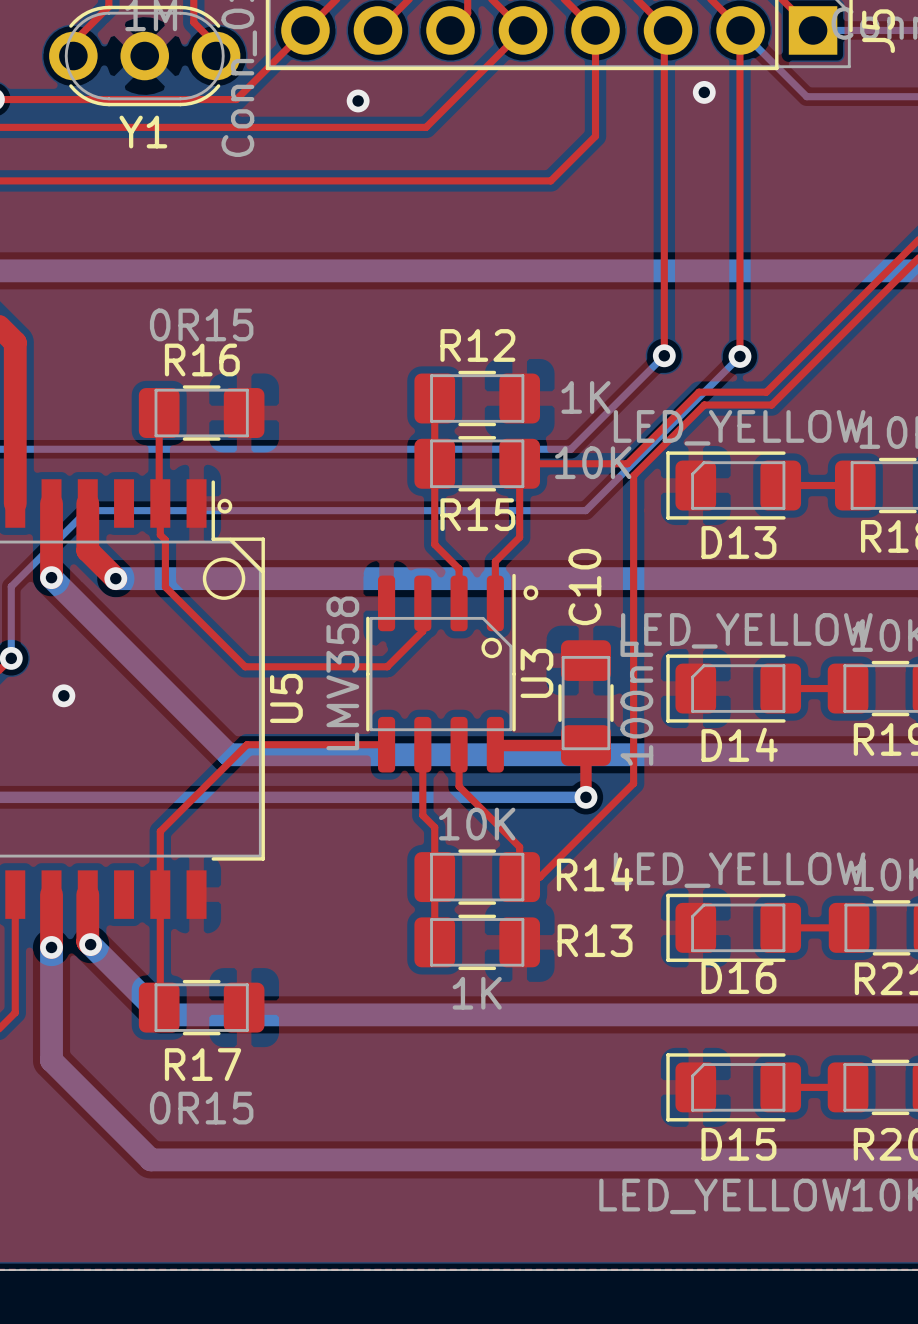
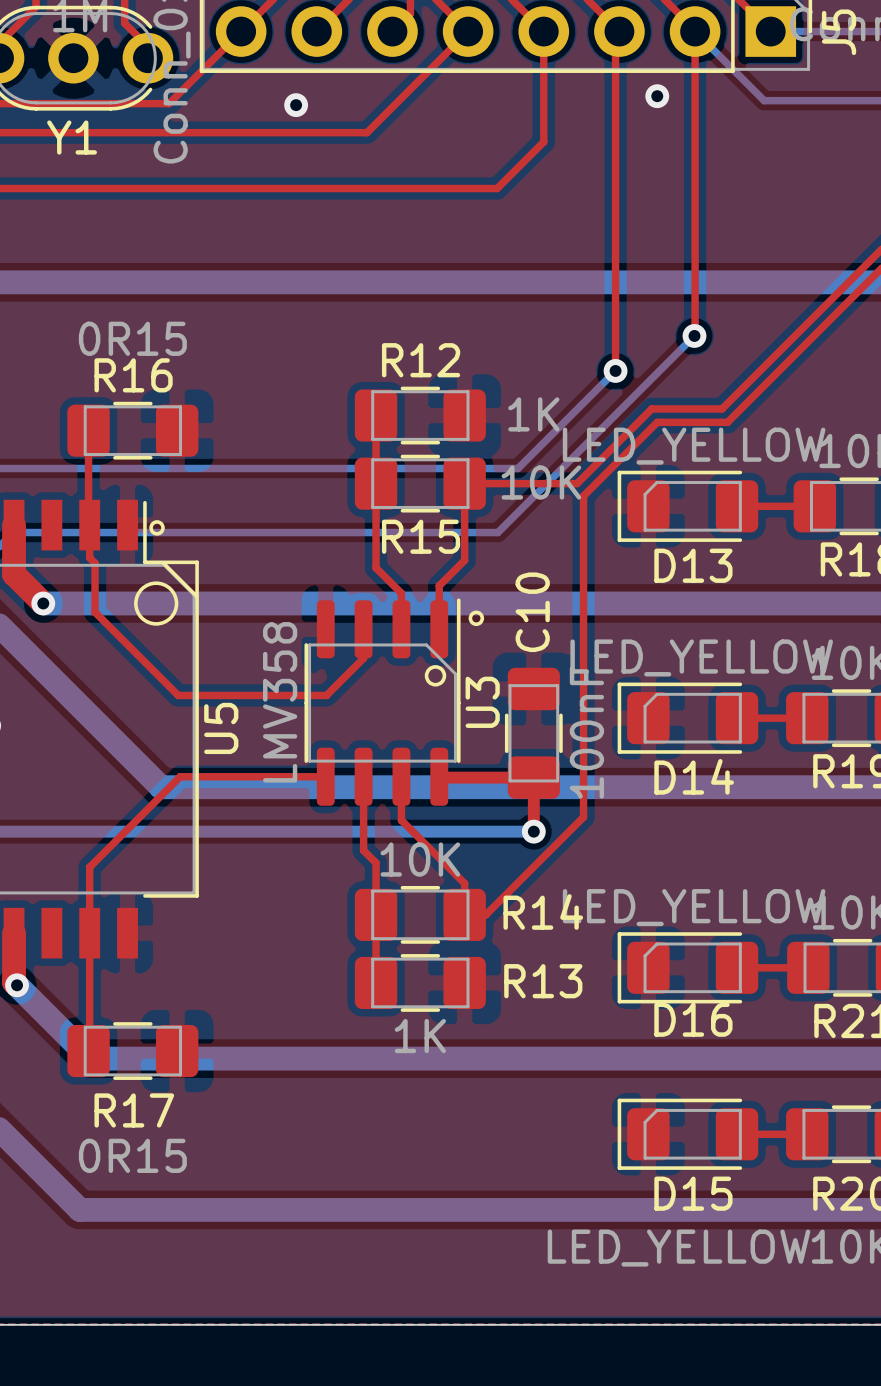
top track: (740, 30) (739, 356) -> (695, 31) (694, 335)
bottom track: (739, 356) (585, 510) (551, 510) -> (694, 335) (497, 532)
via position: (739, 356) -> (694, 335)

